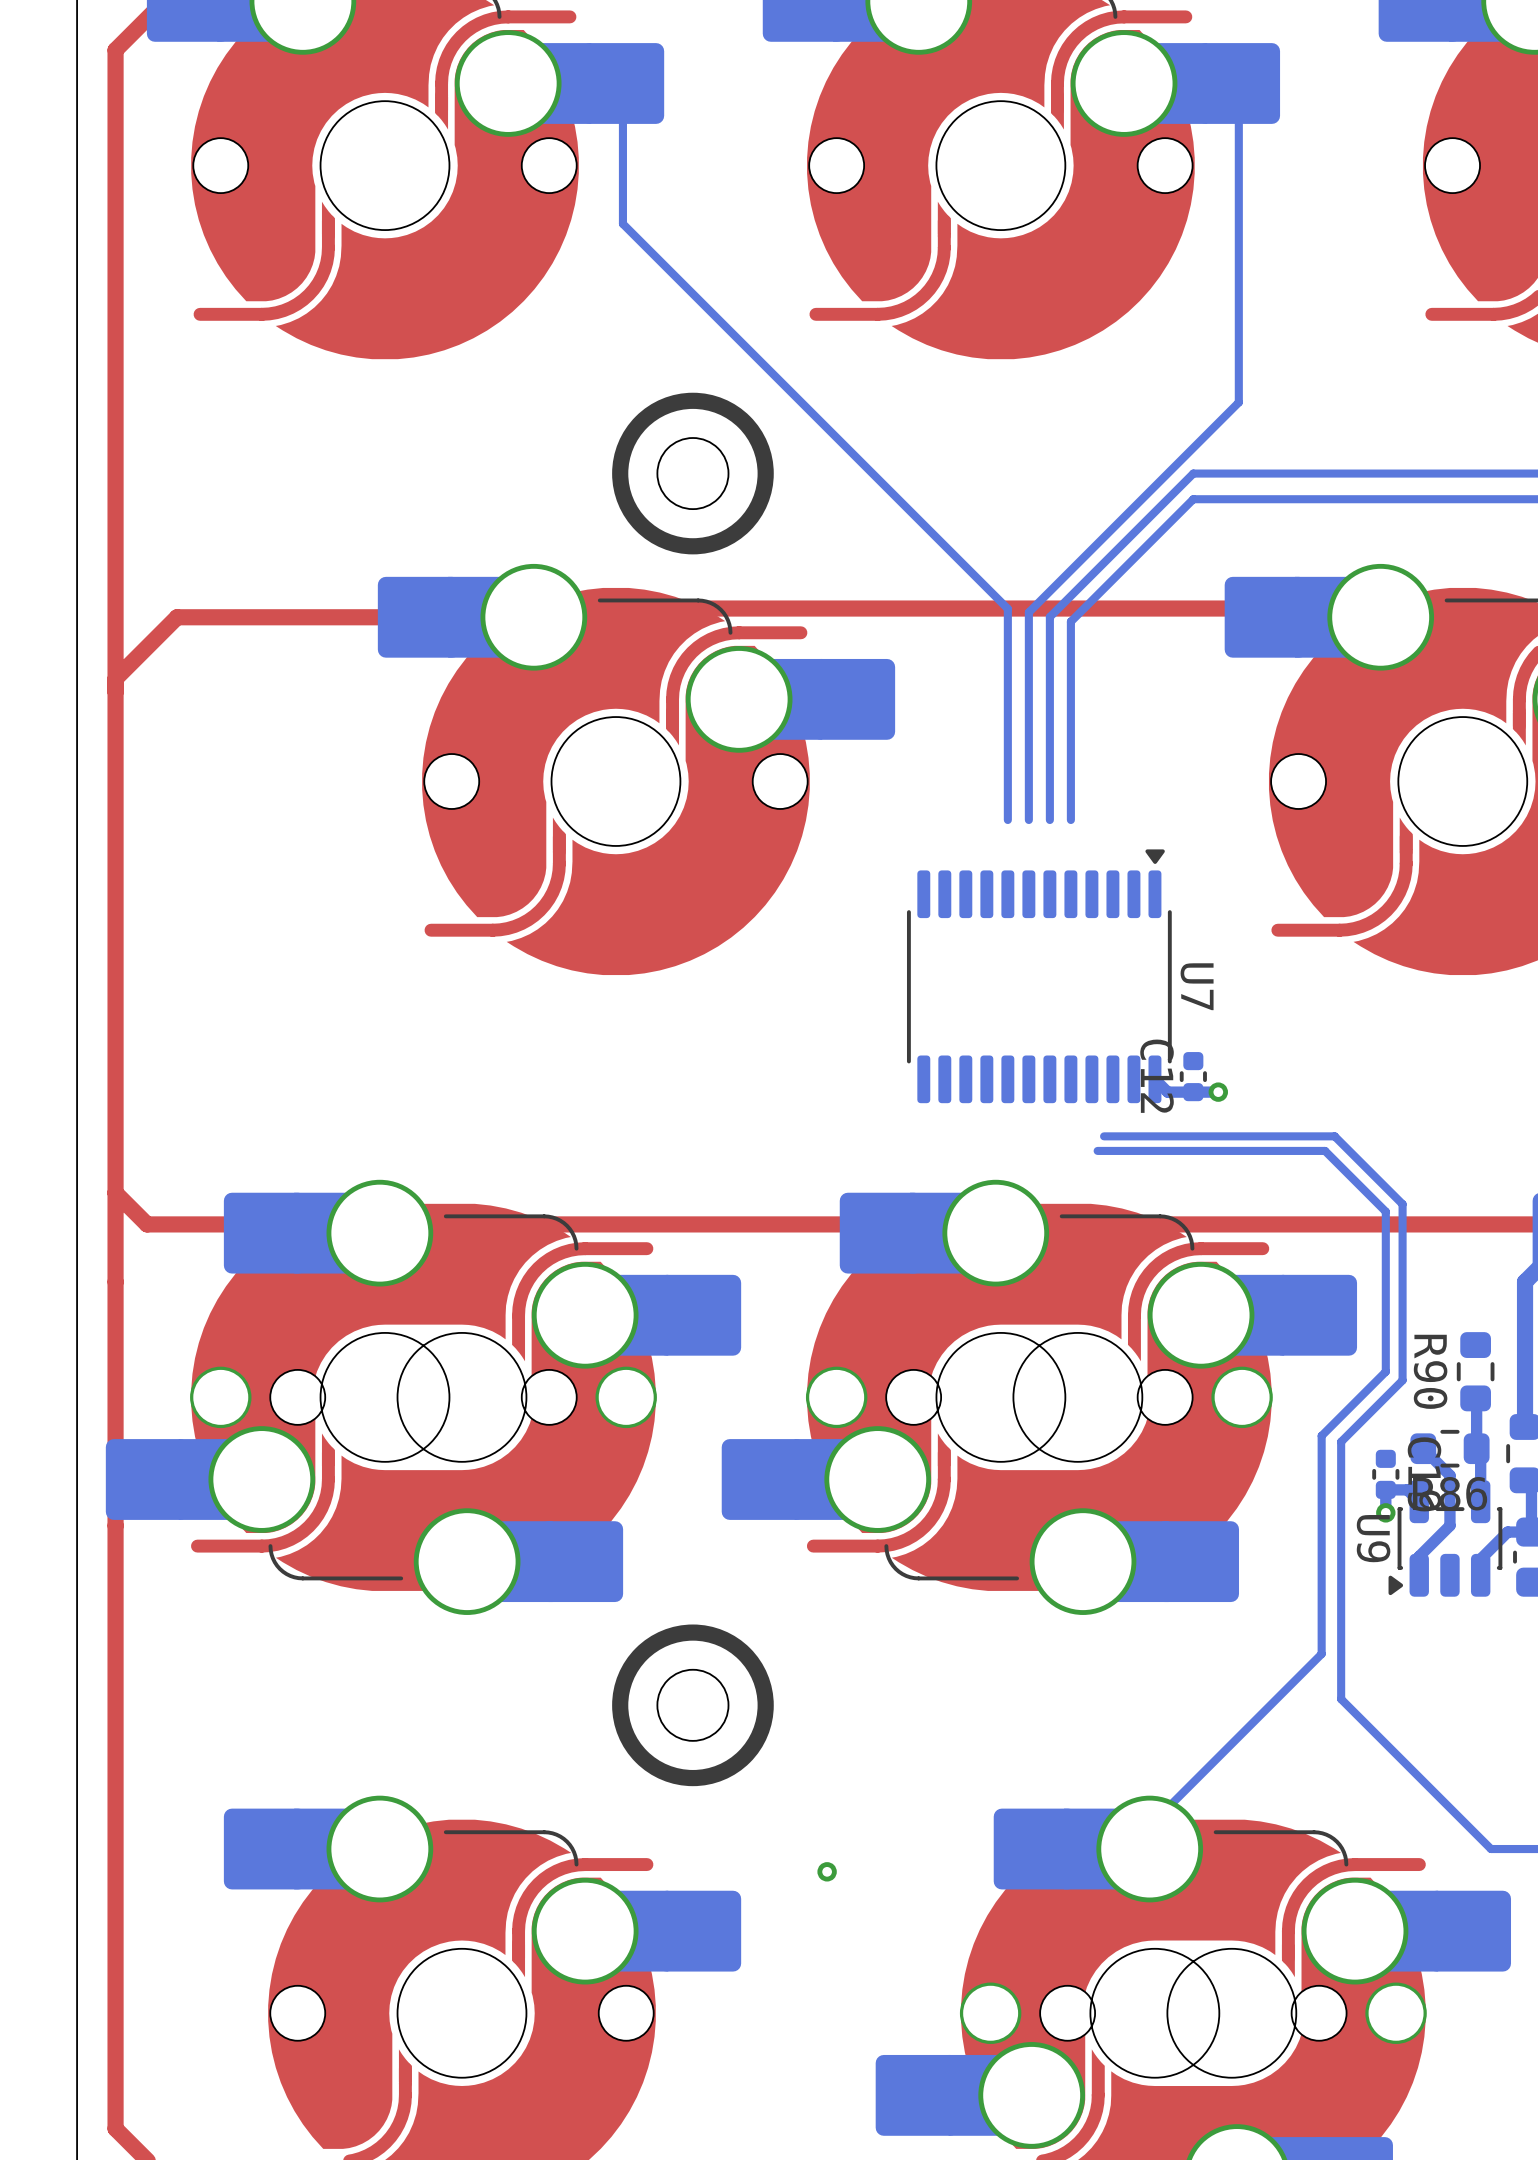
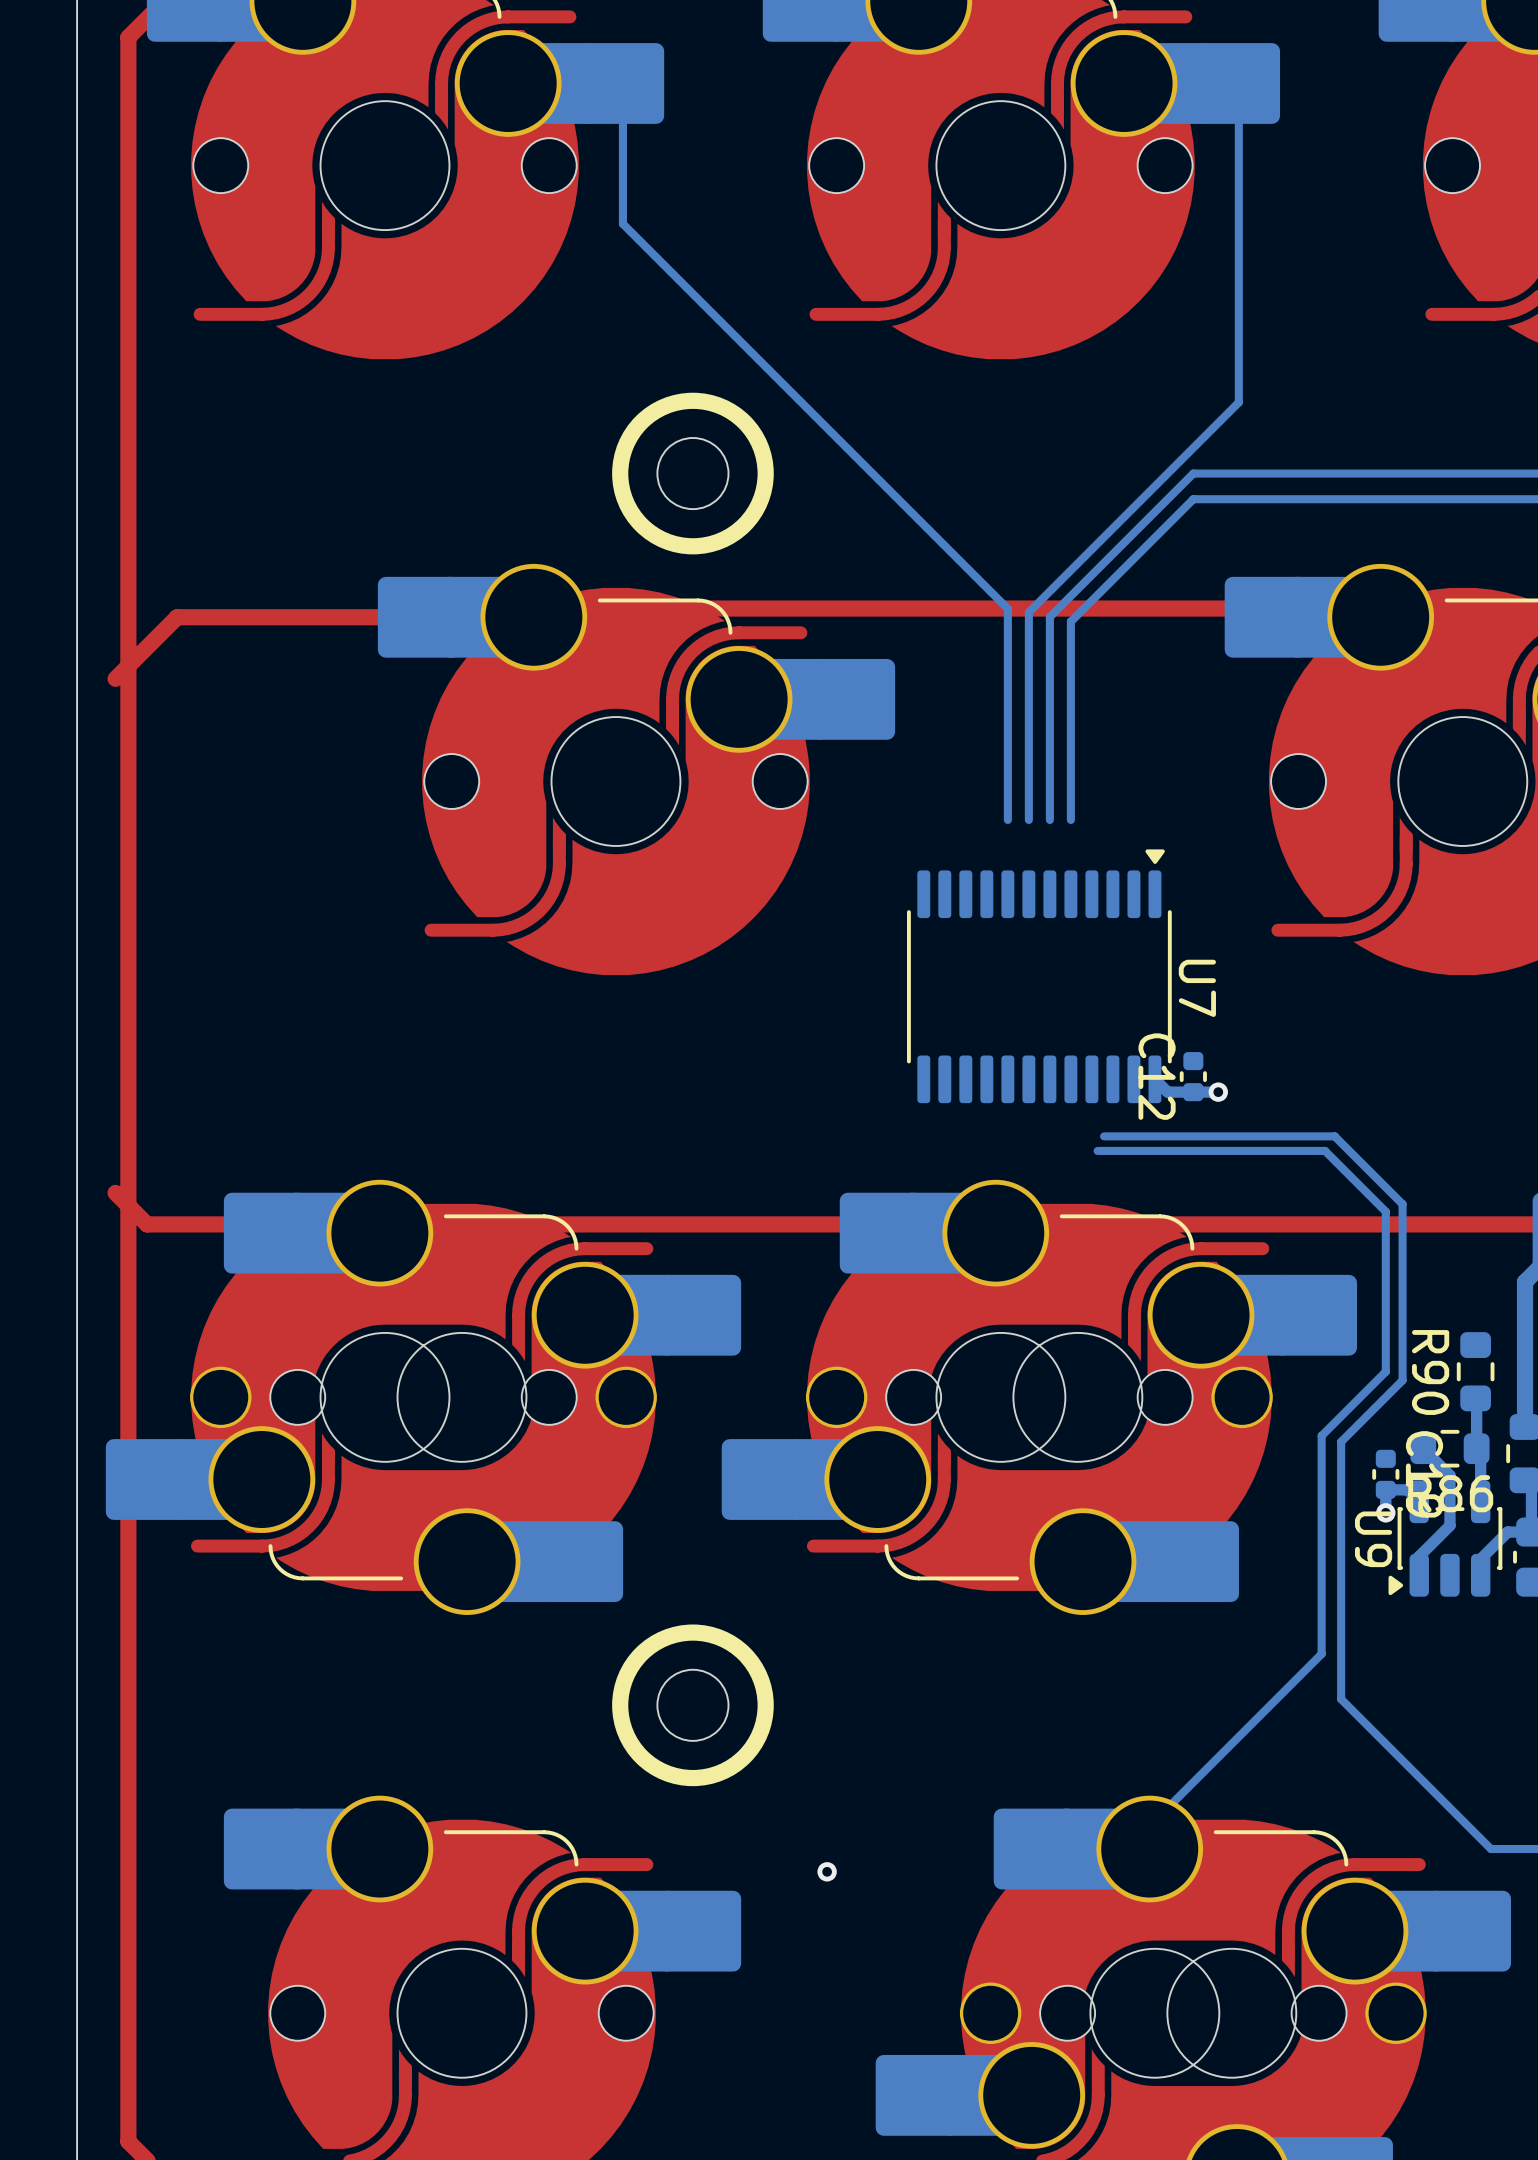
top track: (128, 37) (115, 50) (115, 2128) (128, 2141) -> (128, 37) (128, 2141)

